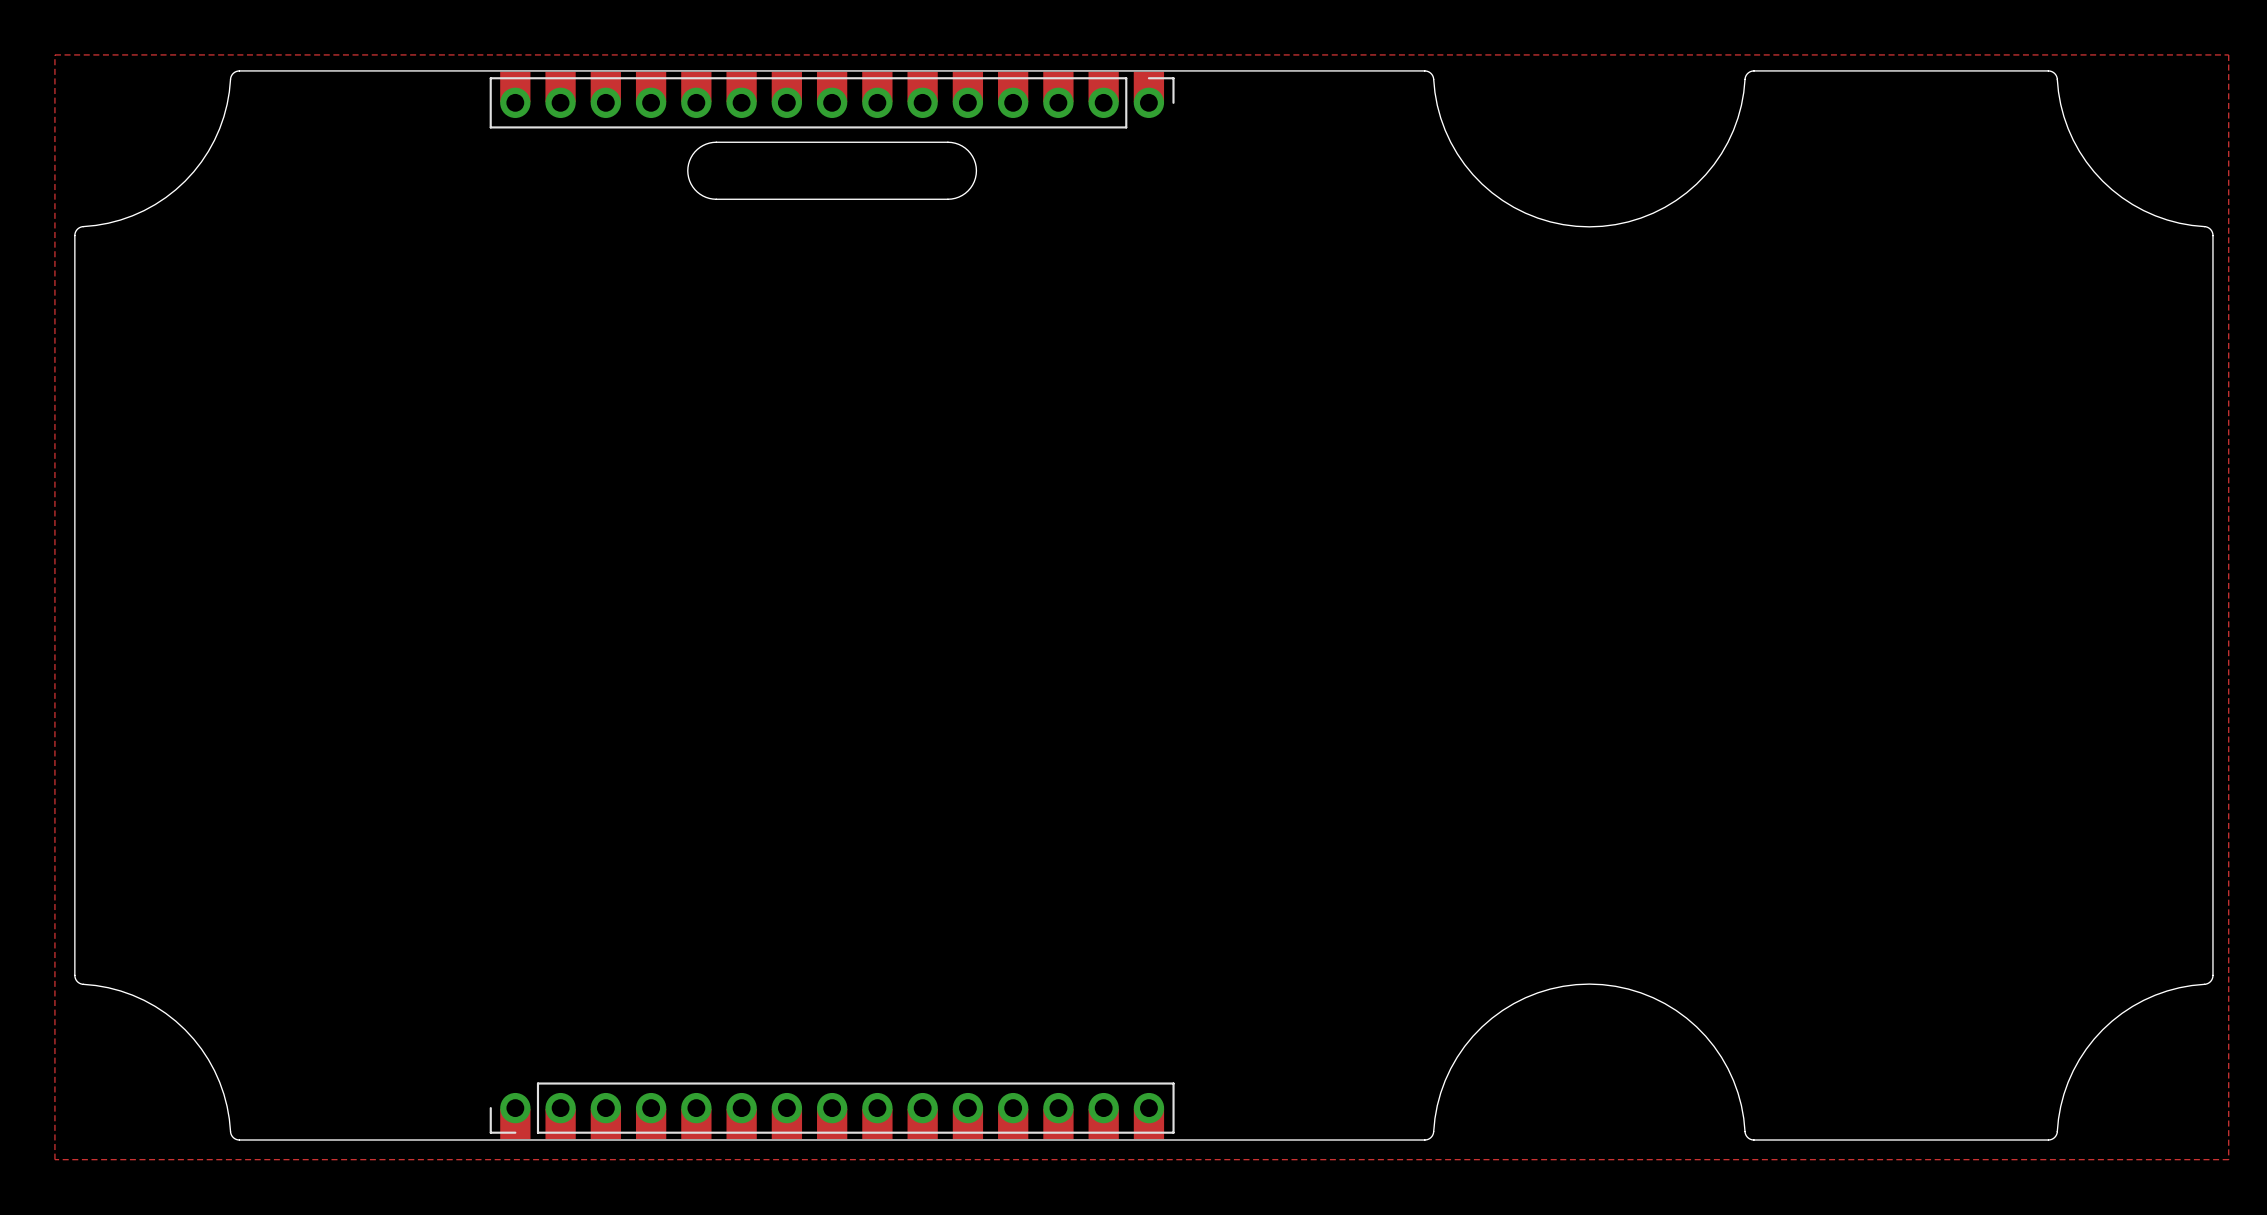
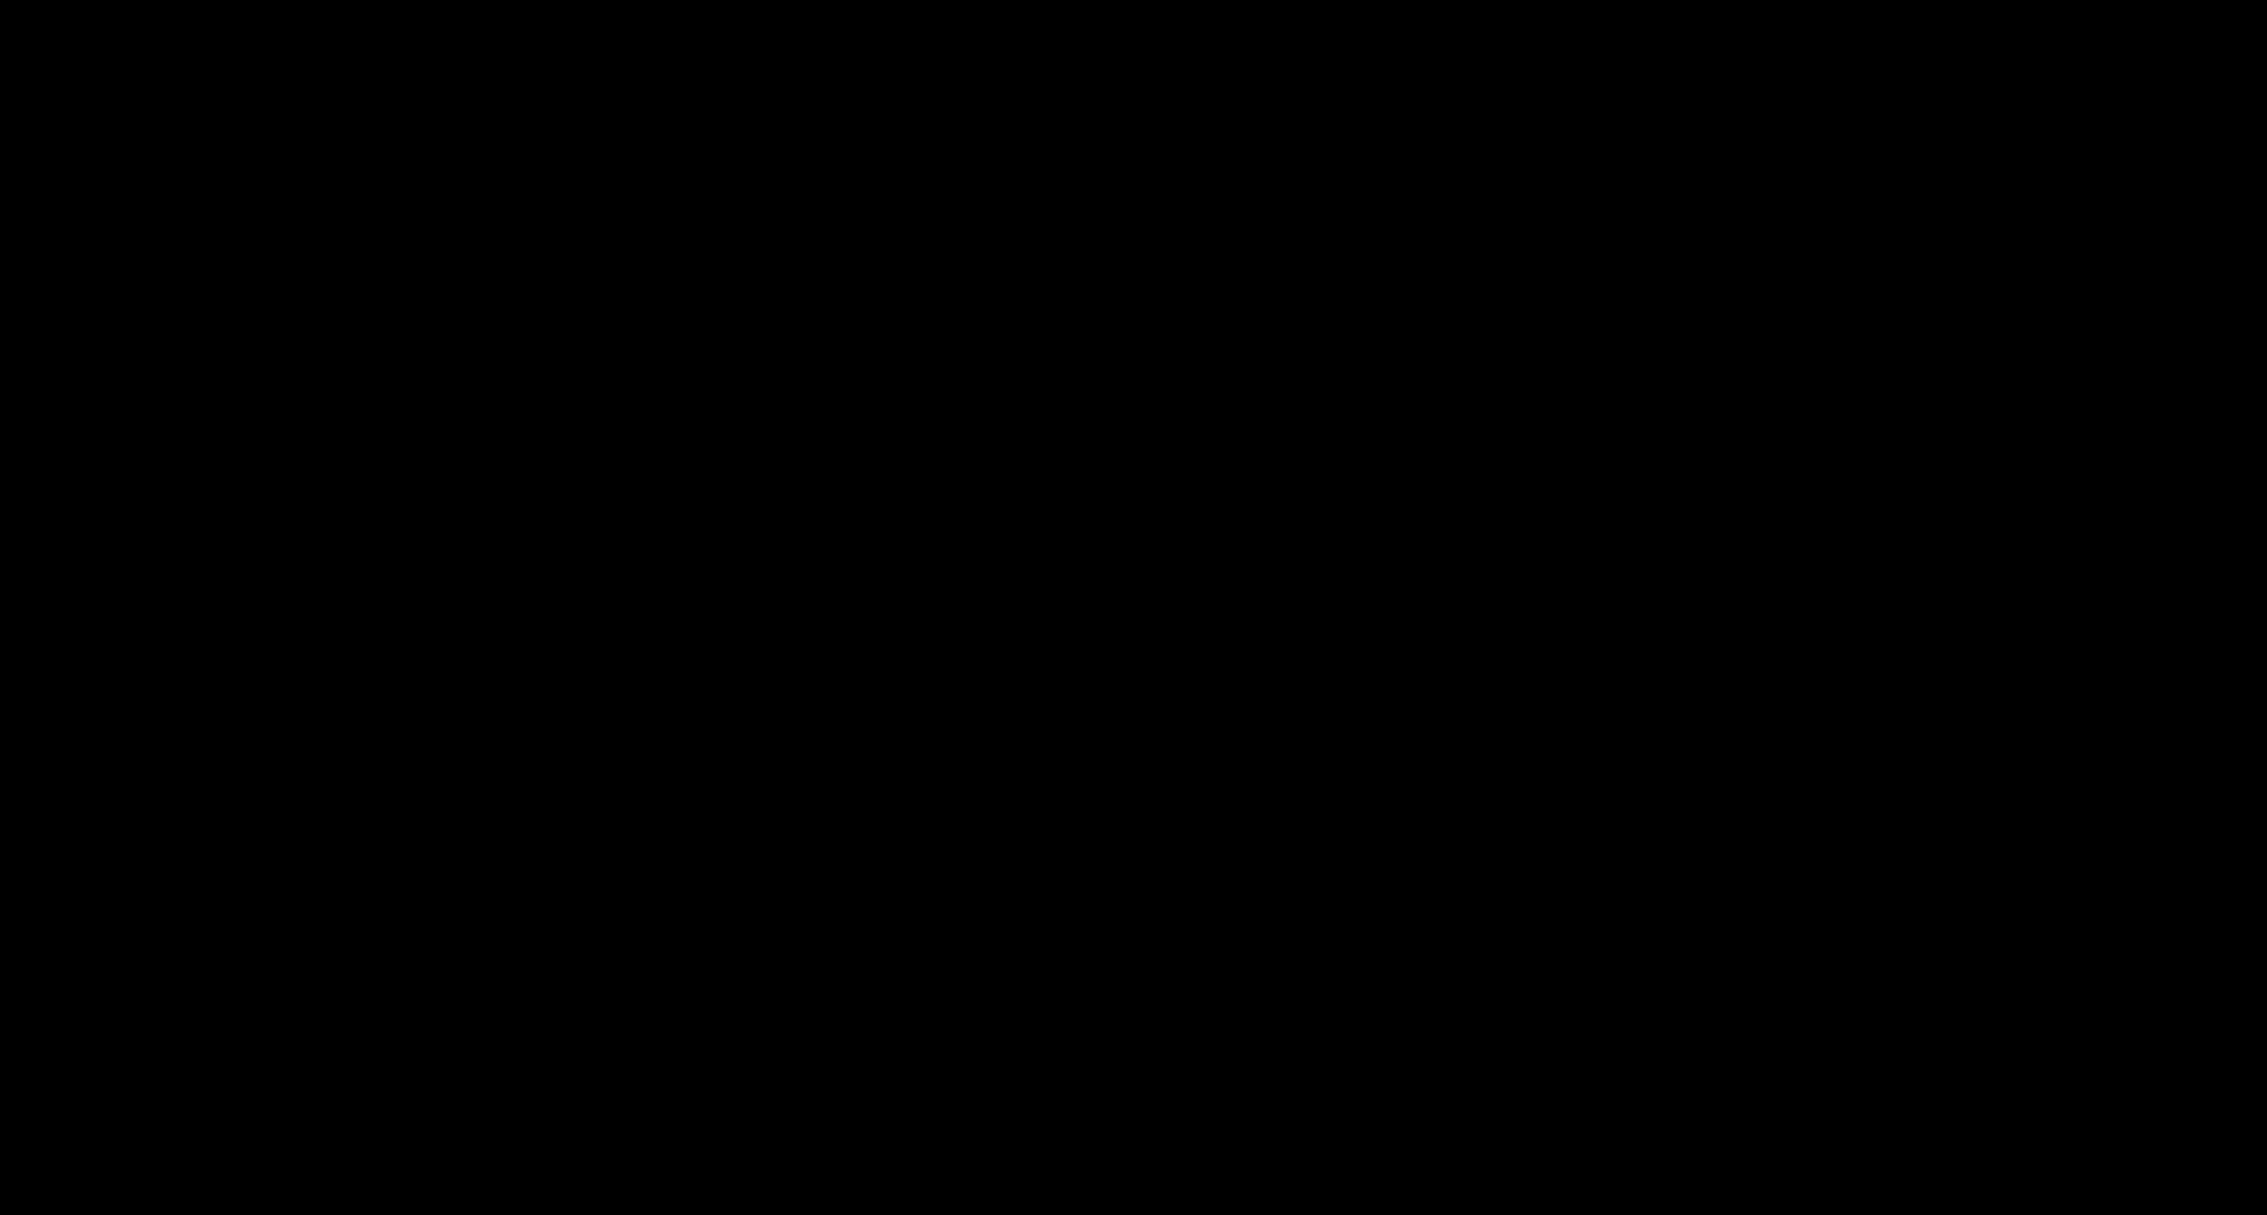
zone outline: (54, 54) (2228, 54) (2228, 1159) (54, 1159) (54, 54) -> none
board edge: (239, 70) (1425, 71) (1433, 77) (1437, 105) (1450, 142) (1464, 164) (1482, 184) (1502, 200) (1525, 213) (1563, 224) (1589, 226) (1615, 224) (1653, 213) (1676, 200) (1696, 184) (1714, 164) (1727, 142) (1741, 105) (1745, 77) (1750, 71) (2051, 71) (2056, 77) (2060, 104) (2073, 140) (2086, 161) (2102, 181) (2122, 197) (2143, 210) (2179, 223) (2206, 227) (2212, 234) (2212, 978) (2206, 983) (2179, 987) (2143, 1000) (2122, 1013) (2102, 1029) (2086, 1049) (2073, 1070) (2060, 1106) (2056, 1133) (2049, 1139) (1750, 1139) (1745, 1133) (1741, 1105) (1727, 1068) (1714, 1046) (1696, 1026) (1676, 1010) (1653, 997) (1615, 986) (1589, 984) (1563, 986) (1537, 992) (1502, 1010) (1482, 1026) (1464, 1046) (1450, 1068) (1437, 1105) (1433, 1133) (1425, 1139) (236, 1139) (230, 1133) (227, 1106) (214, 1070) (201, 1049) (185, 1029) (165, 1013) (144, 1000) (108, 987) (81, 983) (74, 976) (74, 235) (76, 230) (81, 227) (108, 223) (144, 210) (165, 197) (185, 181) (201, 161) (214, 140) (227, 104) (230, 77) (234, 72) (239, 70) -> none
part: (832, 100) -> none
board edge: (716, 142) (951, 142) (962, 146) (970, 153) (975, 163) (976, 174) (968, 190) (951, 199) (712, 199) (703, 196) (694, 189) (689, 180) (687, 170) (691, 157) (697, 149) (706, 144) (716, 142) -> none
part: (832, 1110) -> none

